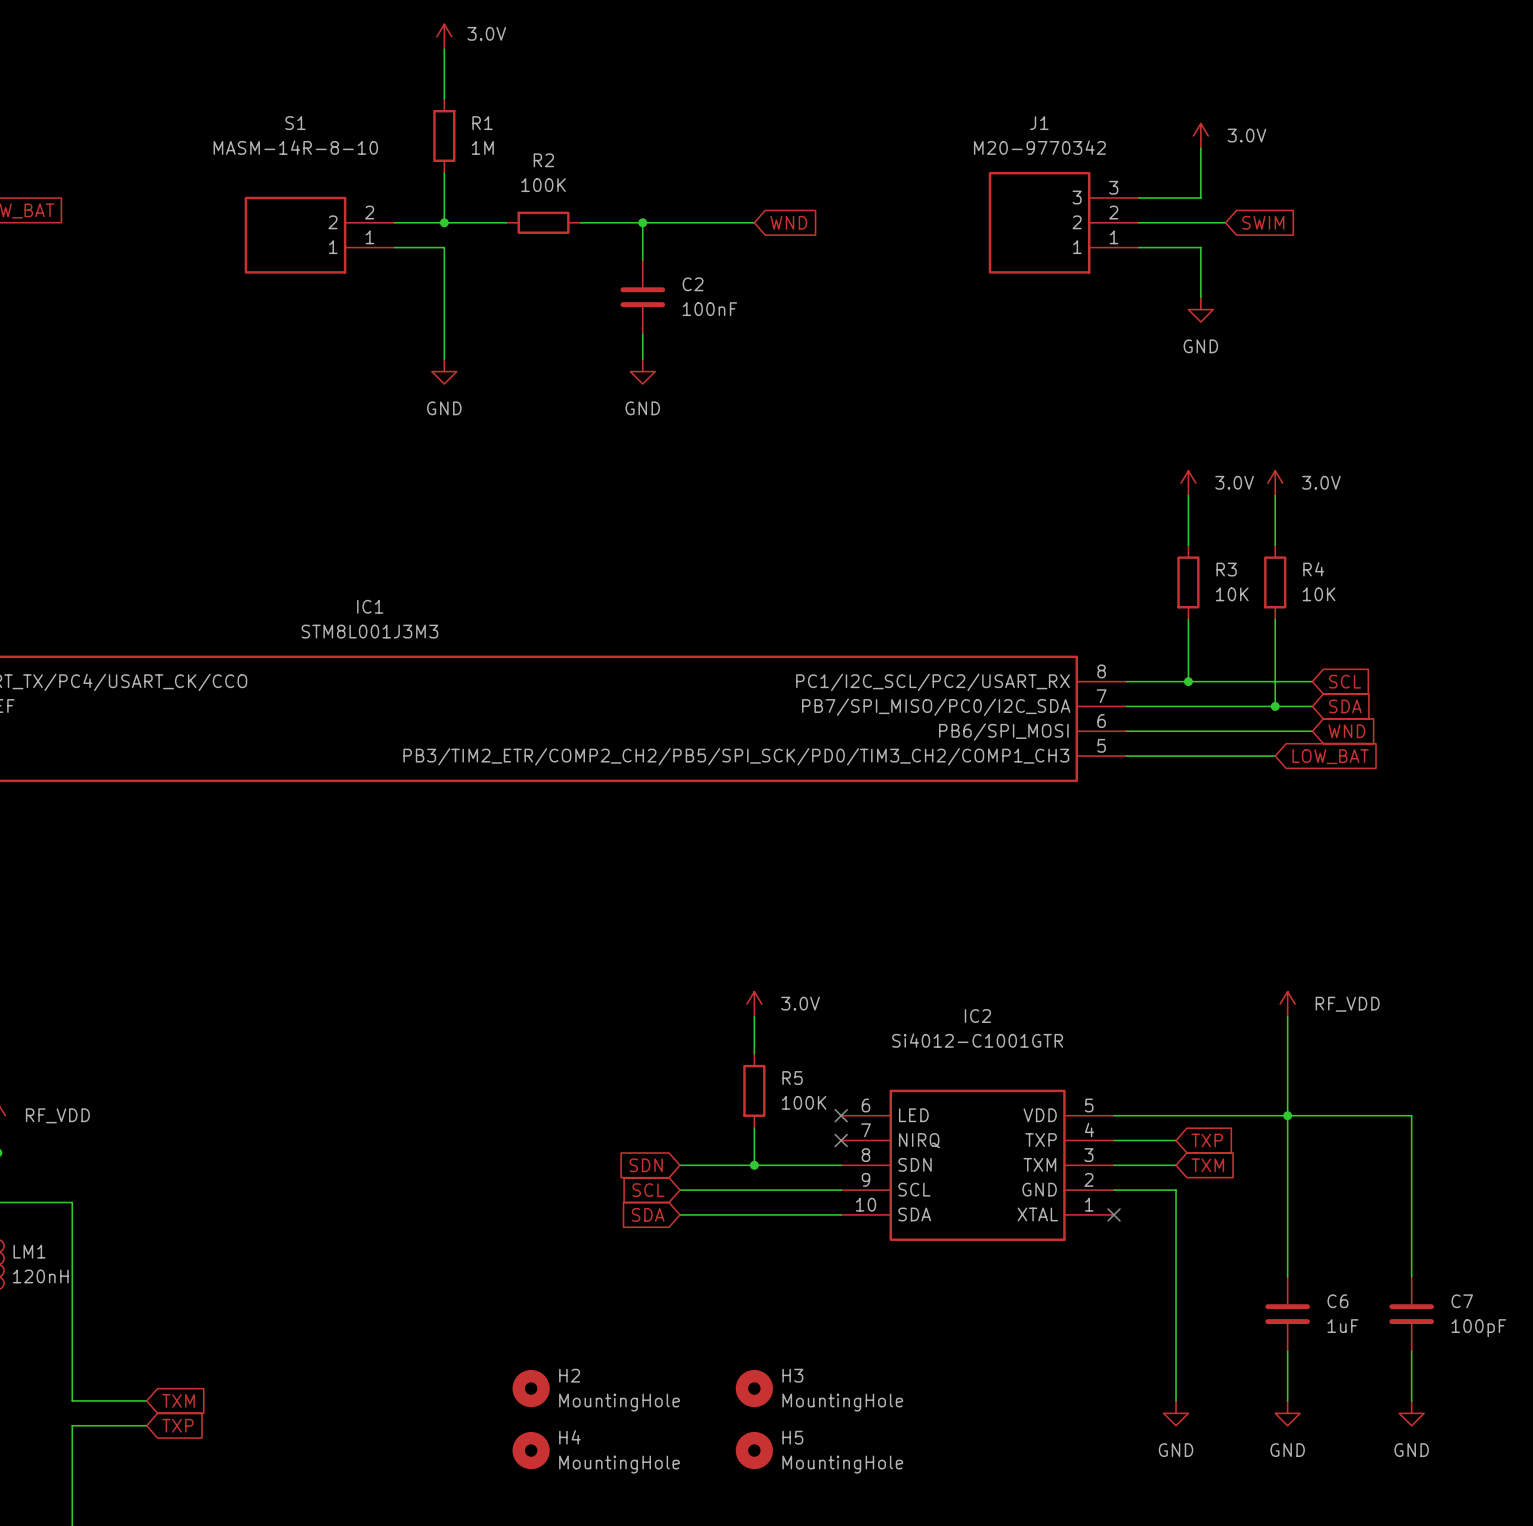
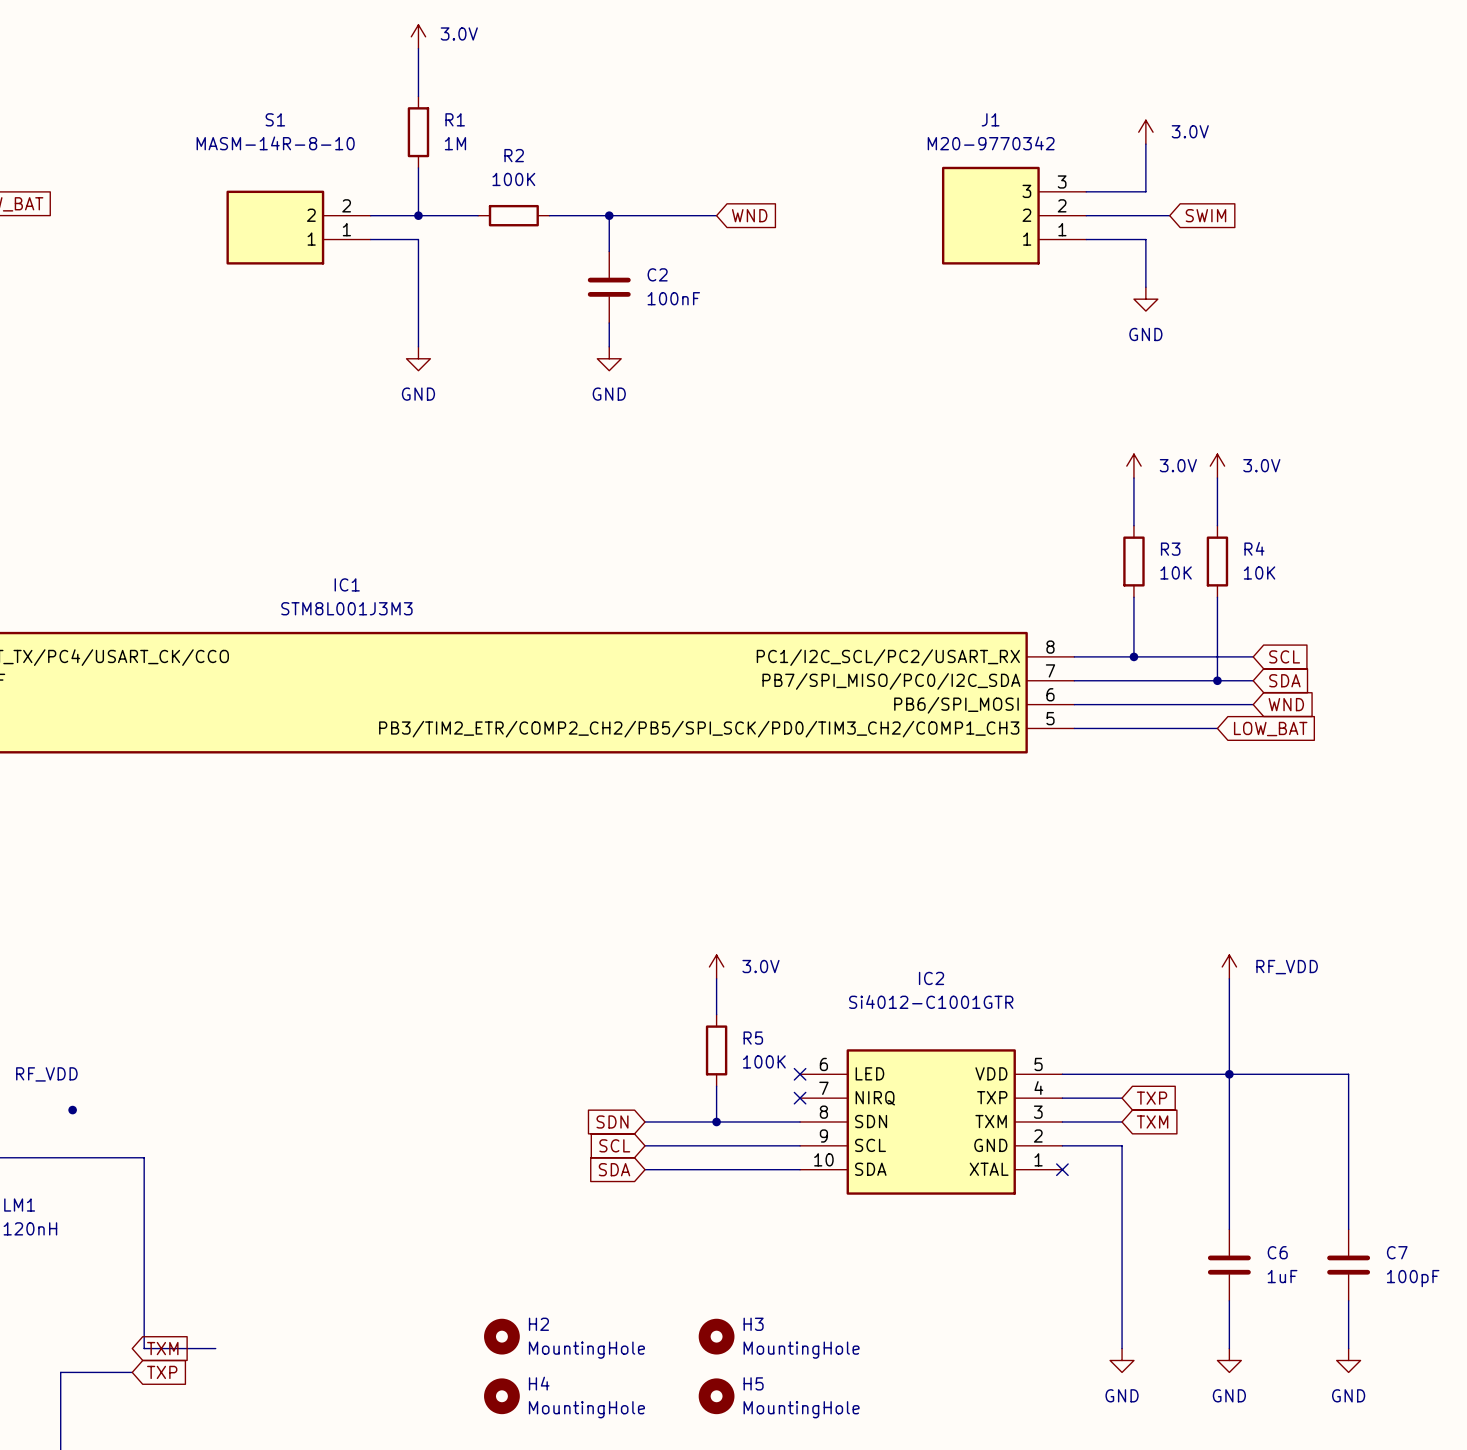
junction: none -> (72, 1110)
wire: (72, 1202) (72, 1400) (146, 1400) -> (60, 1157) (144, 1157) (144, 1348) (215, 1348)

